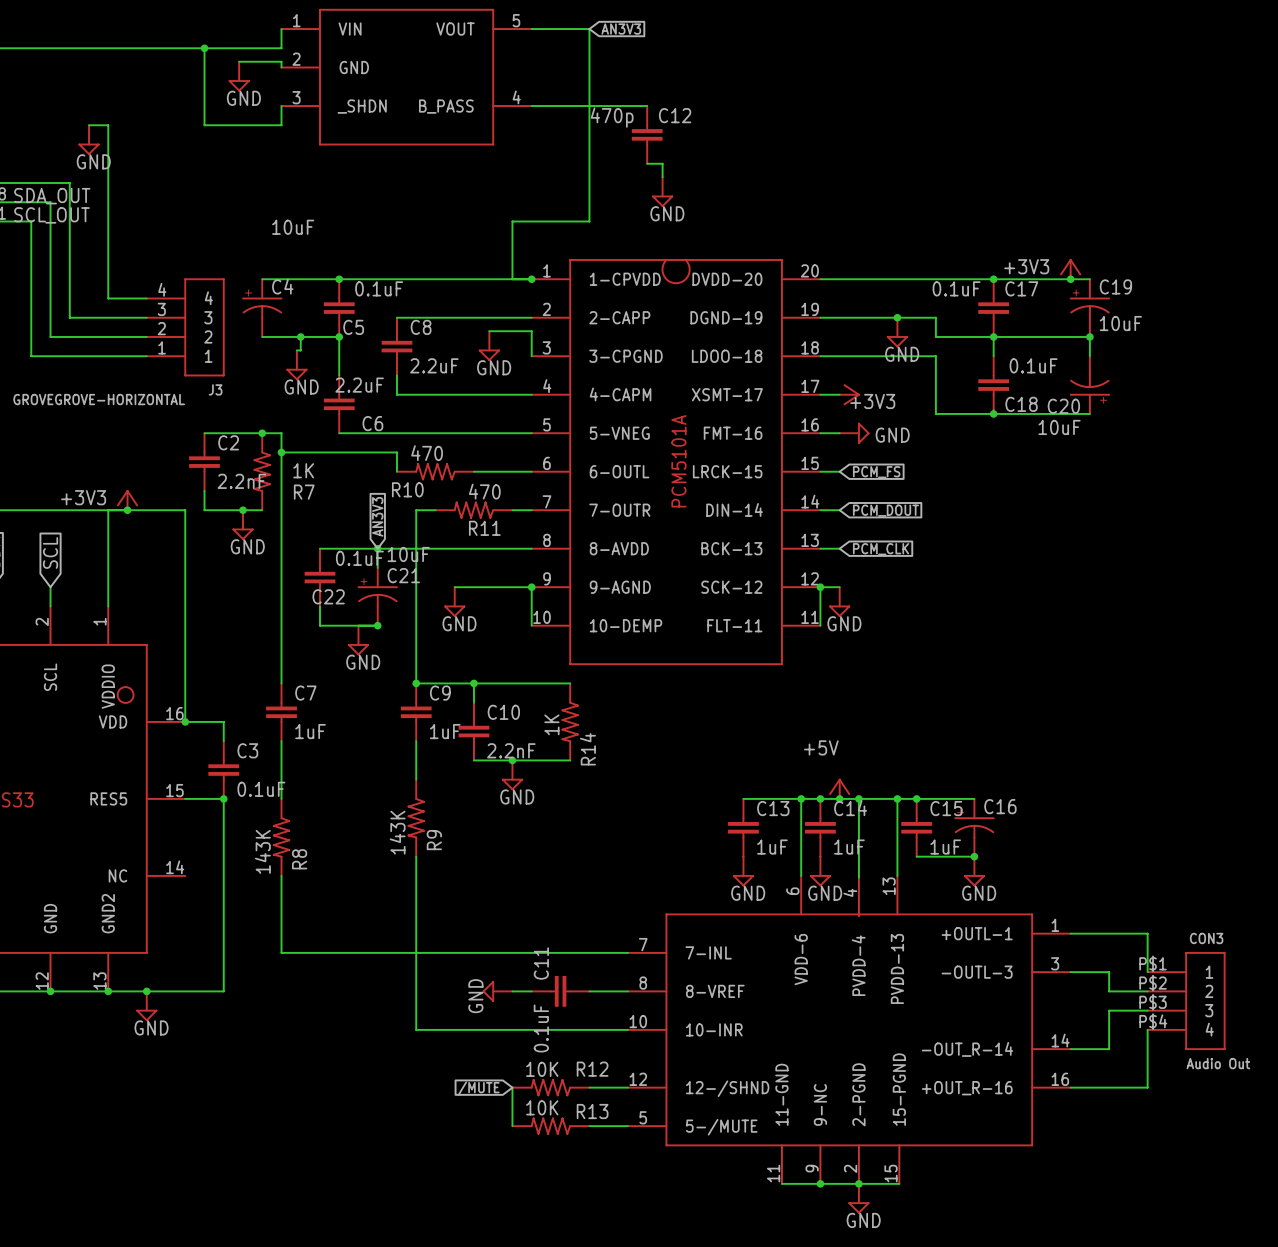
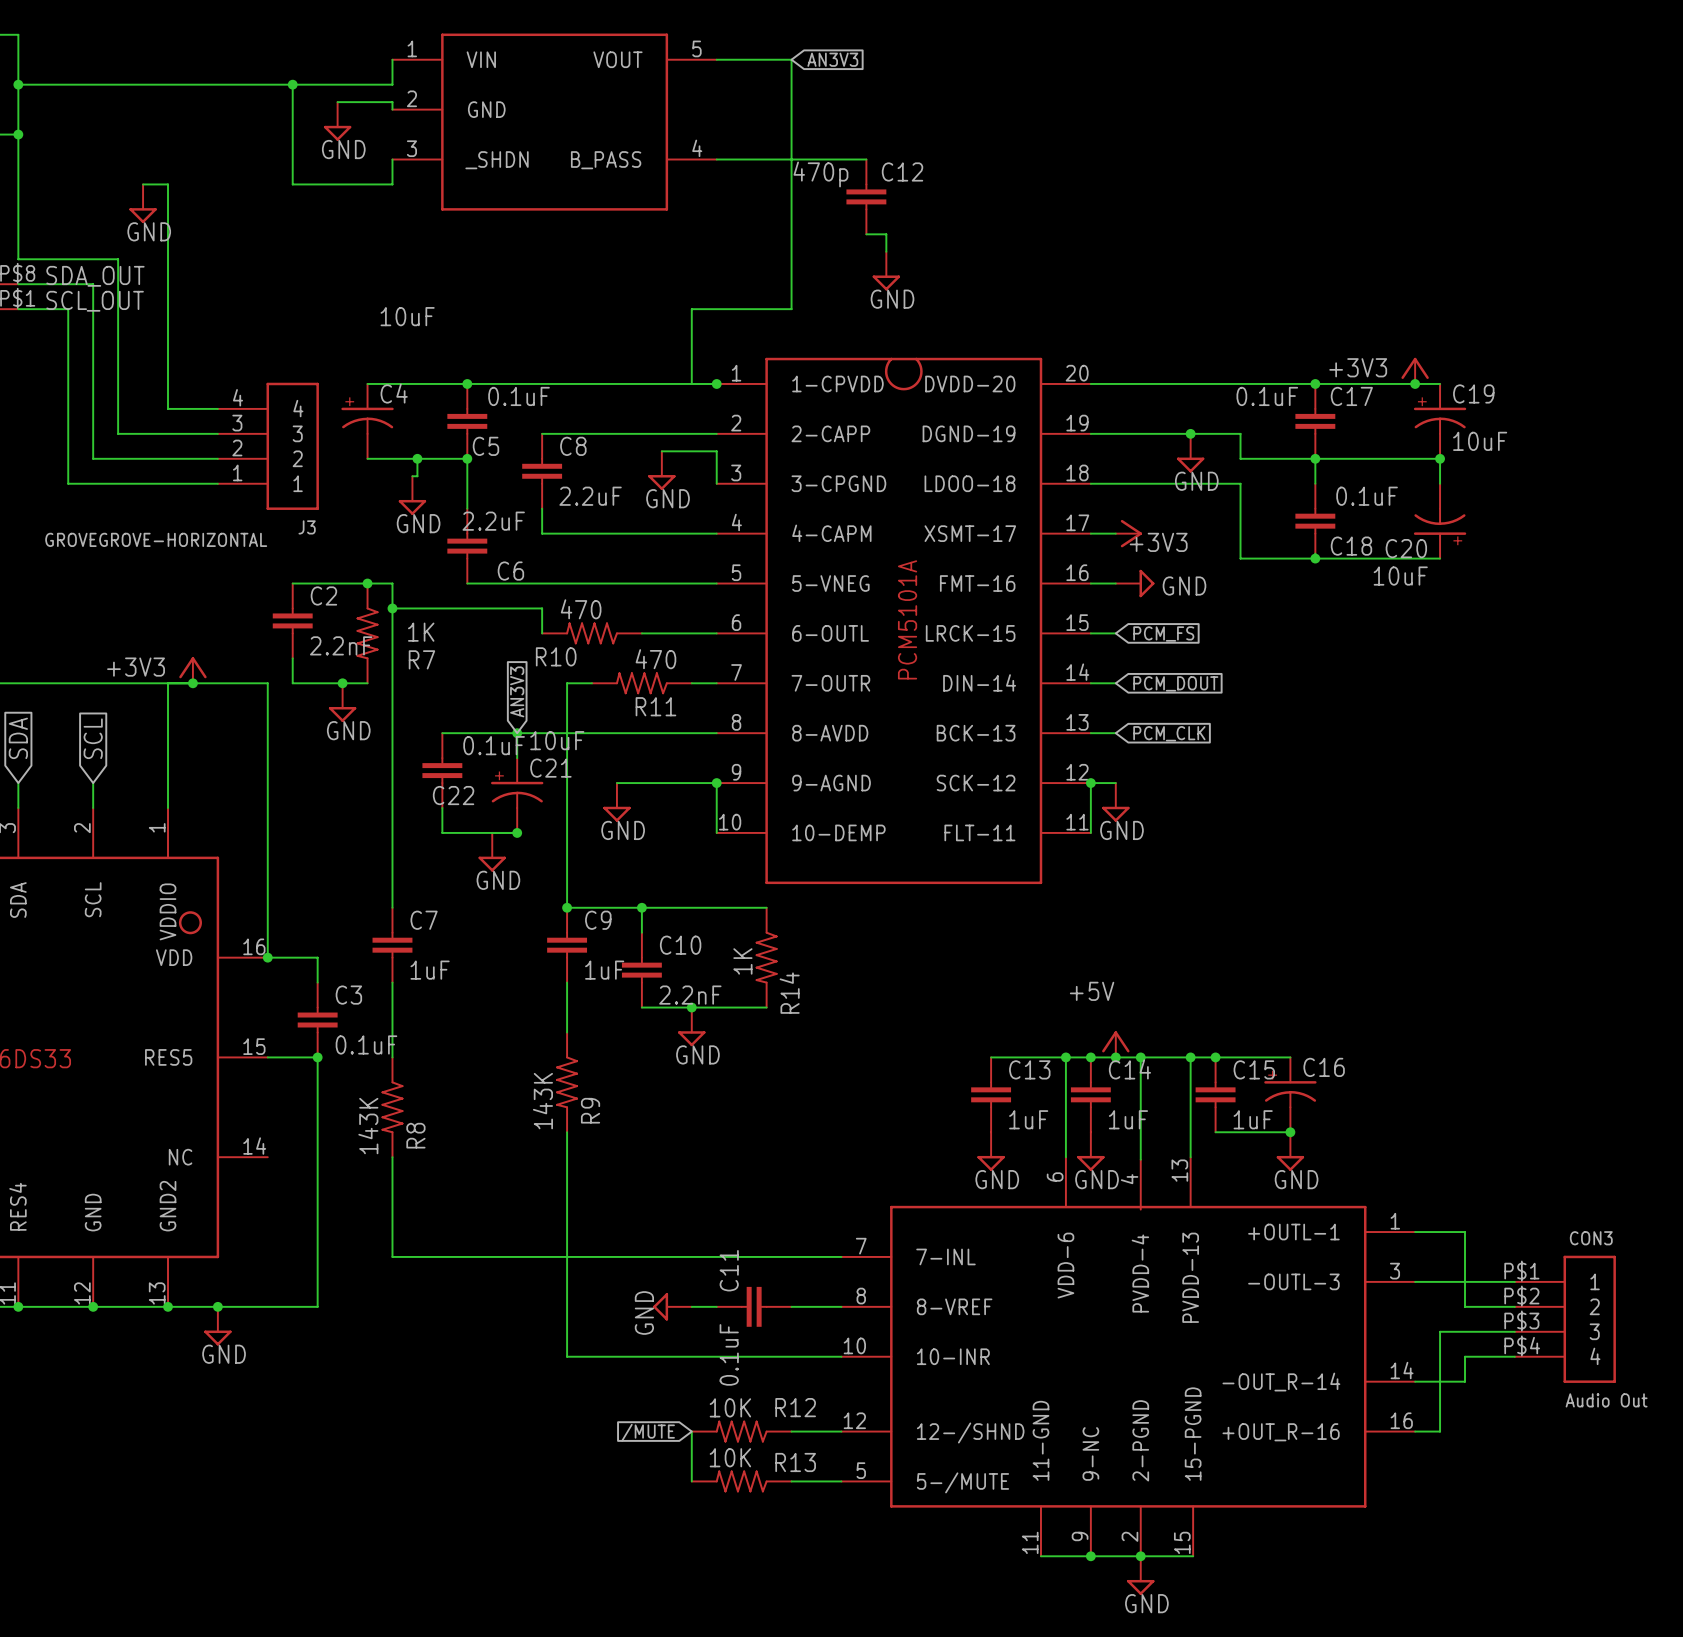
wire: (1109, 933) (1147, 933) (1147, 972) -> (1465, 1232) (1465, 1281) (1514, 1281)
wire: (1109, 1010) (1109, 1029) -> (1514, 1356) (1465, 1356)
wire: (1147, 1029) (1147, 1087) (1089, 1087) -> (1465, 1331) (1440, 1331) (1440, 1431)

